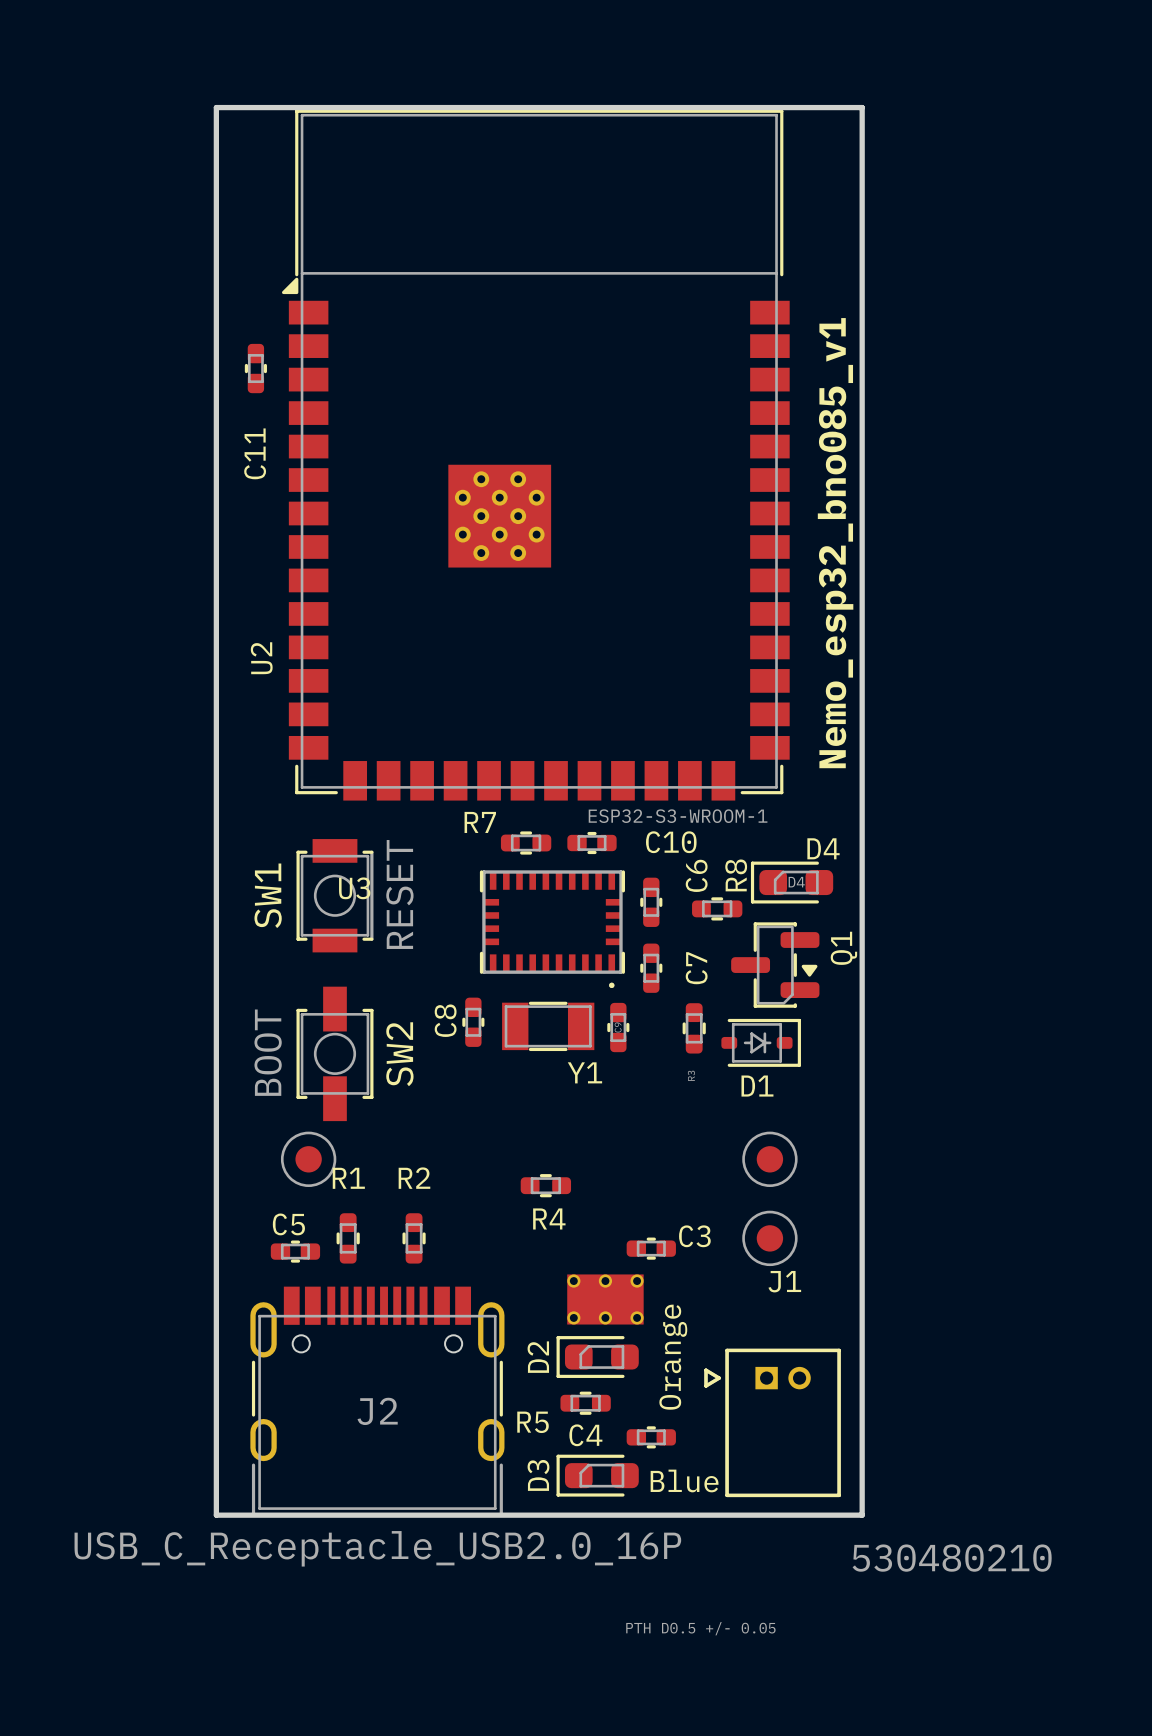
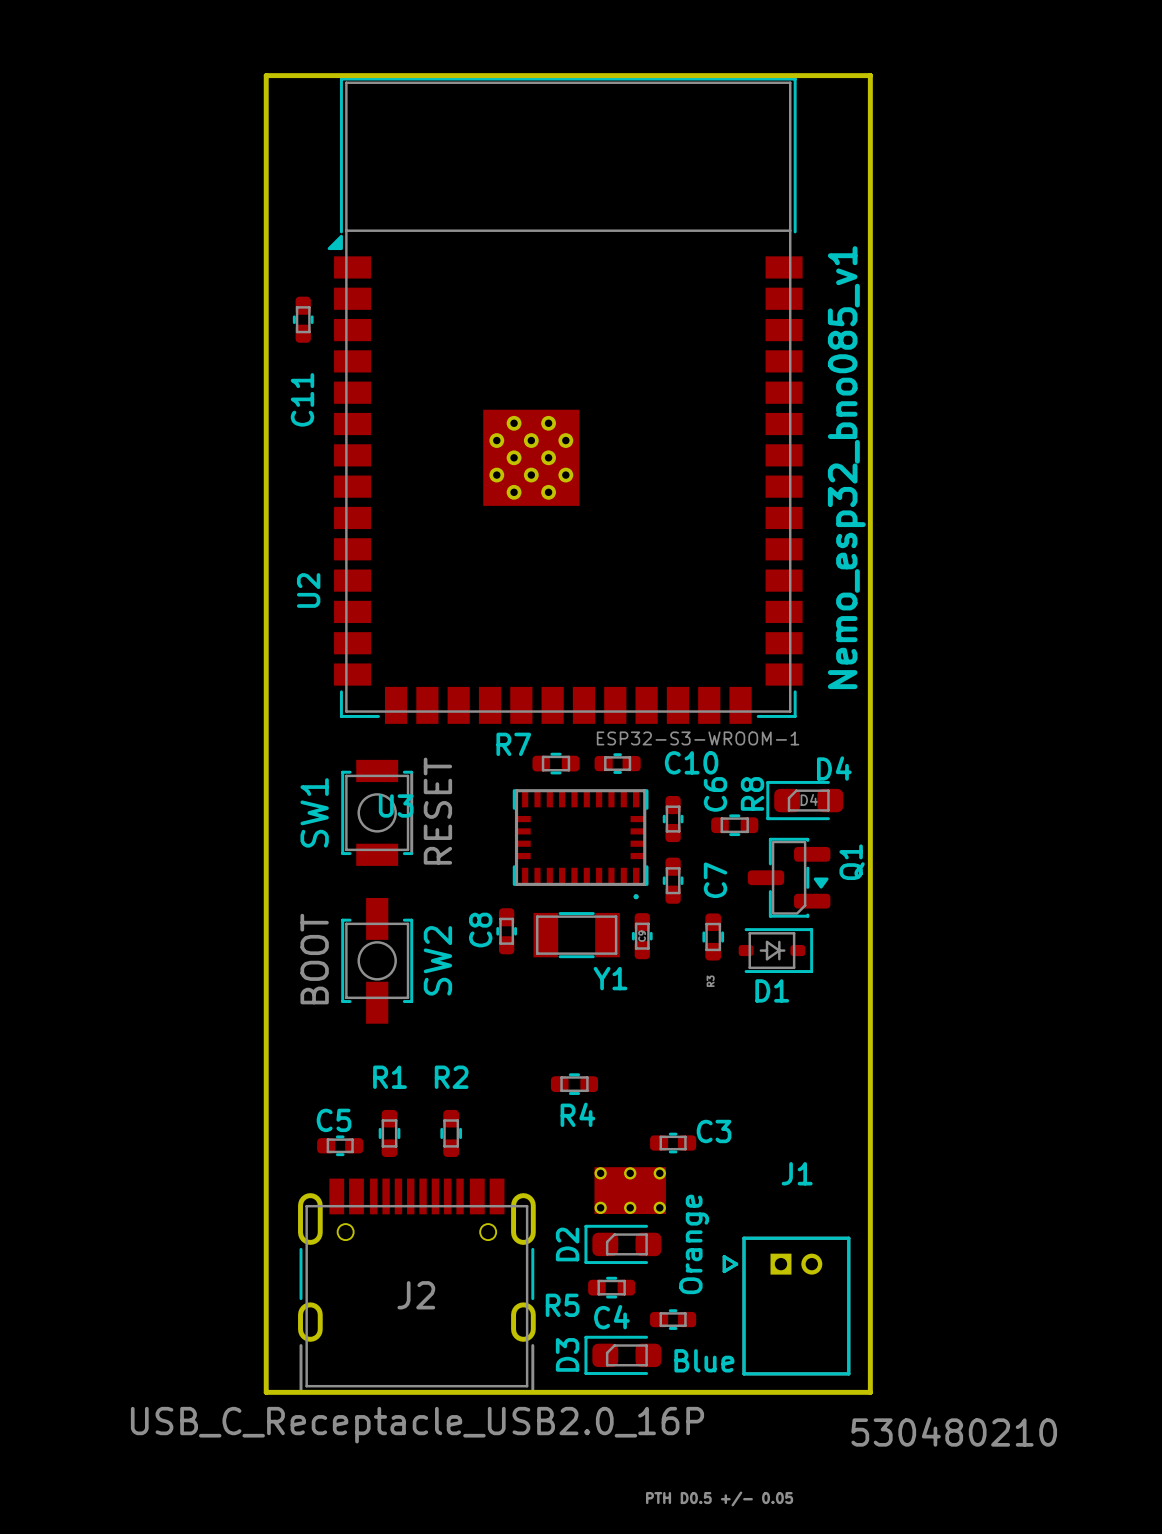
part: (308, 1159) -> none
part: (769, 1159) -> none
part: (769, 1238) -> none

